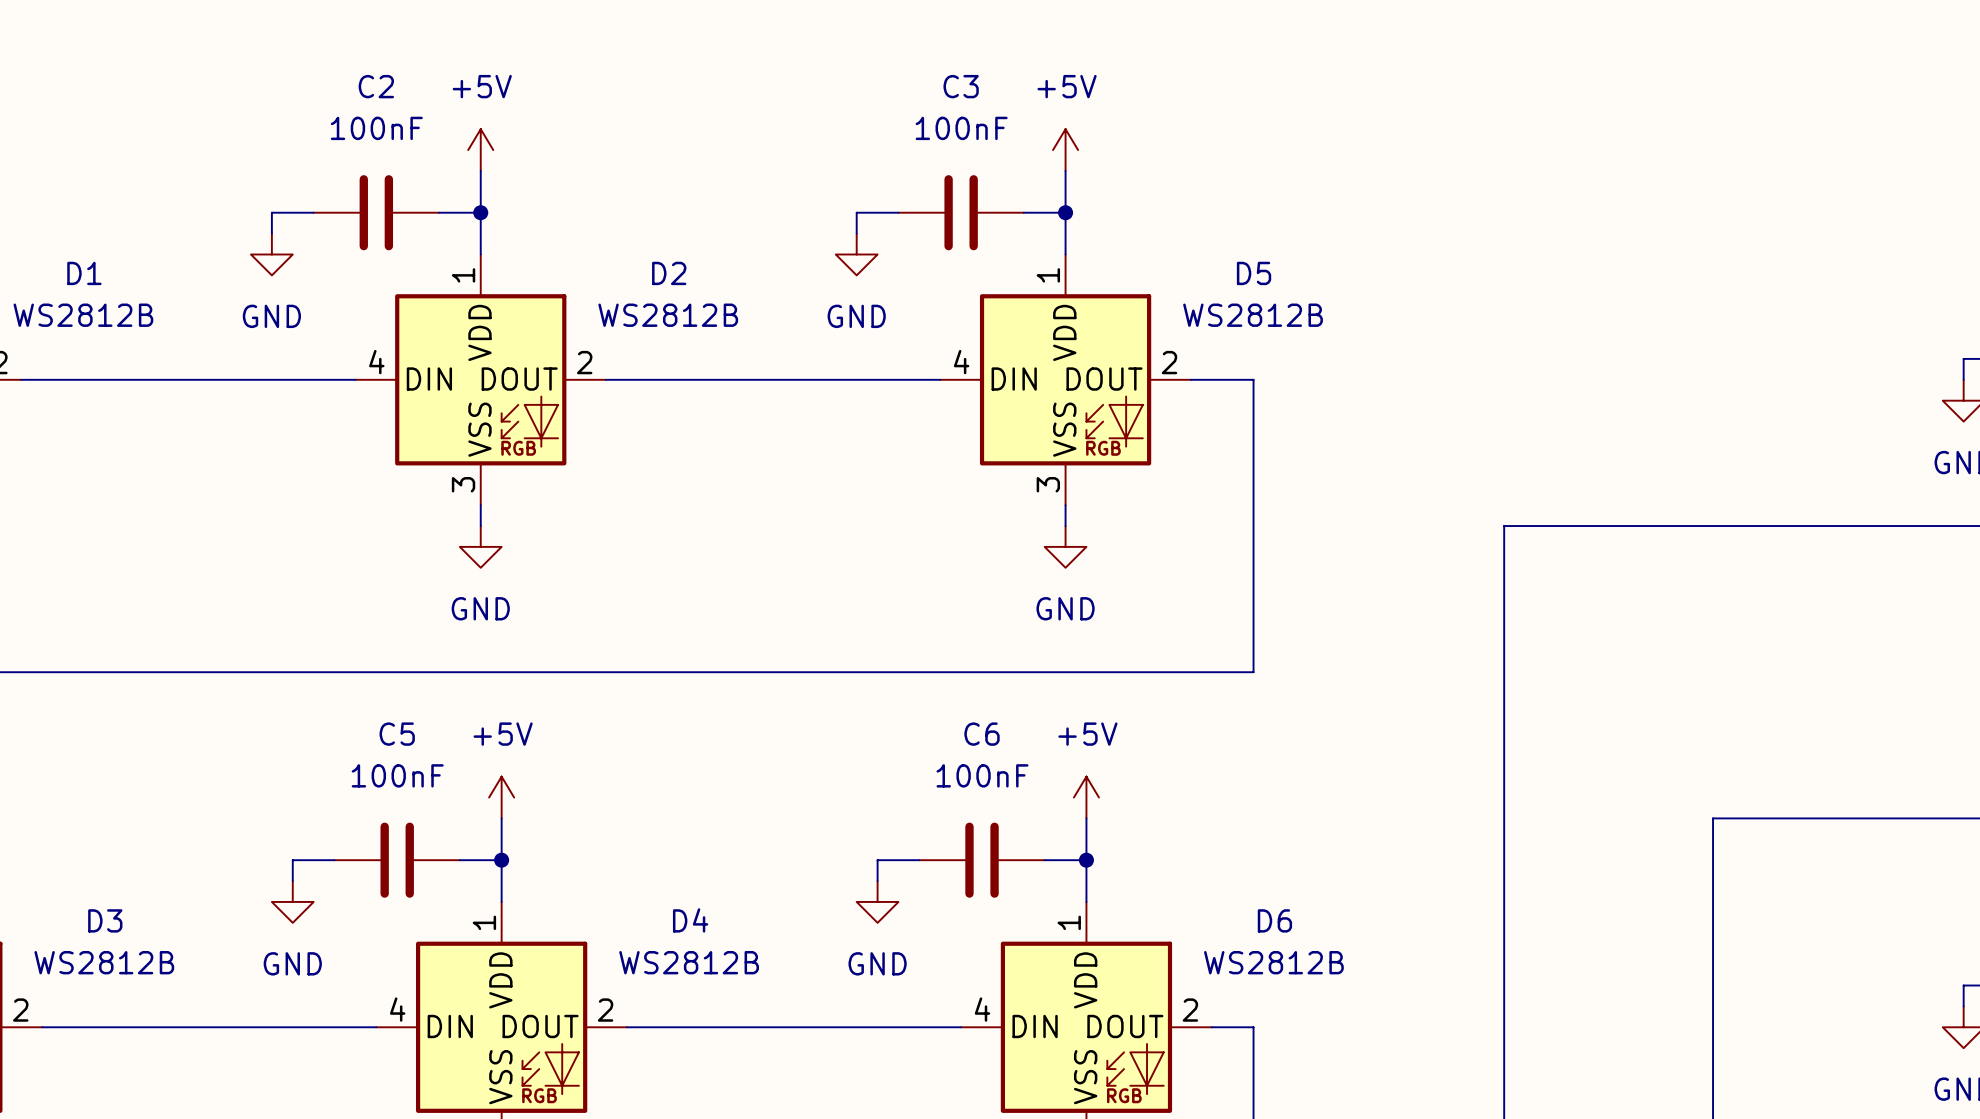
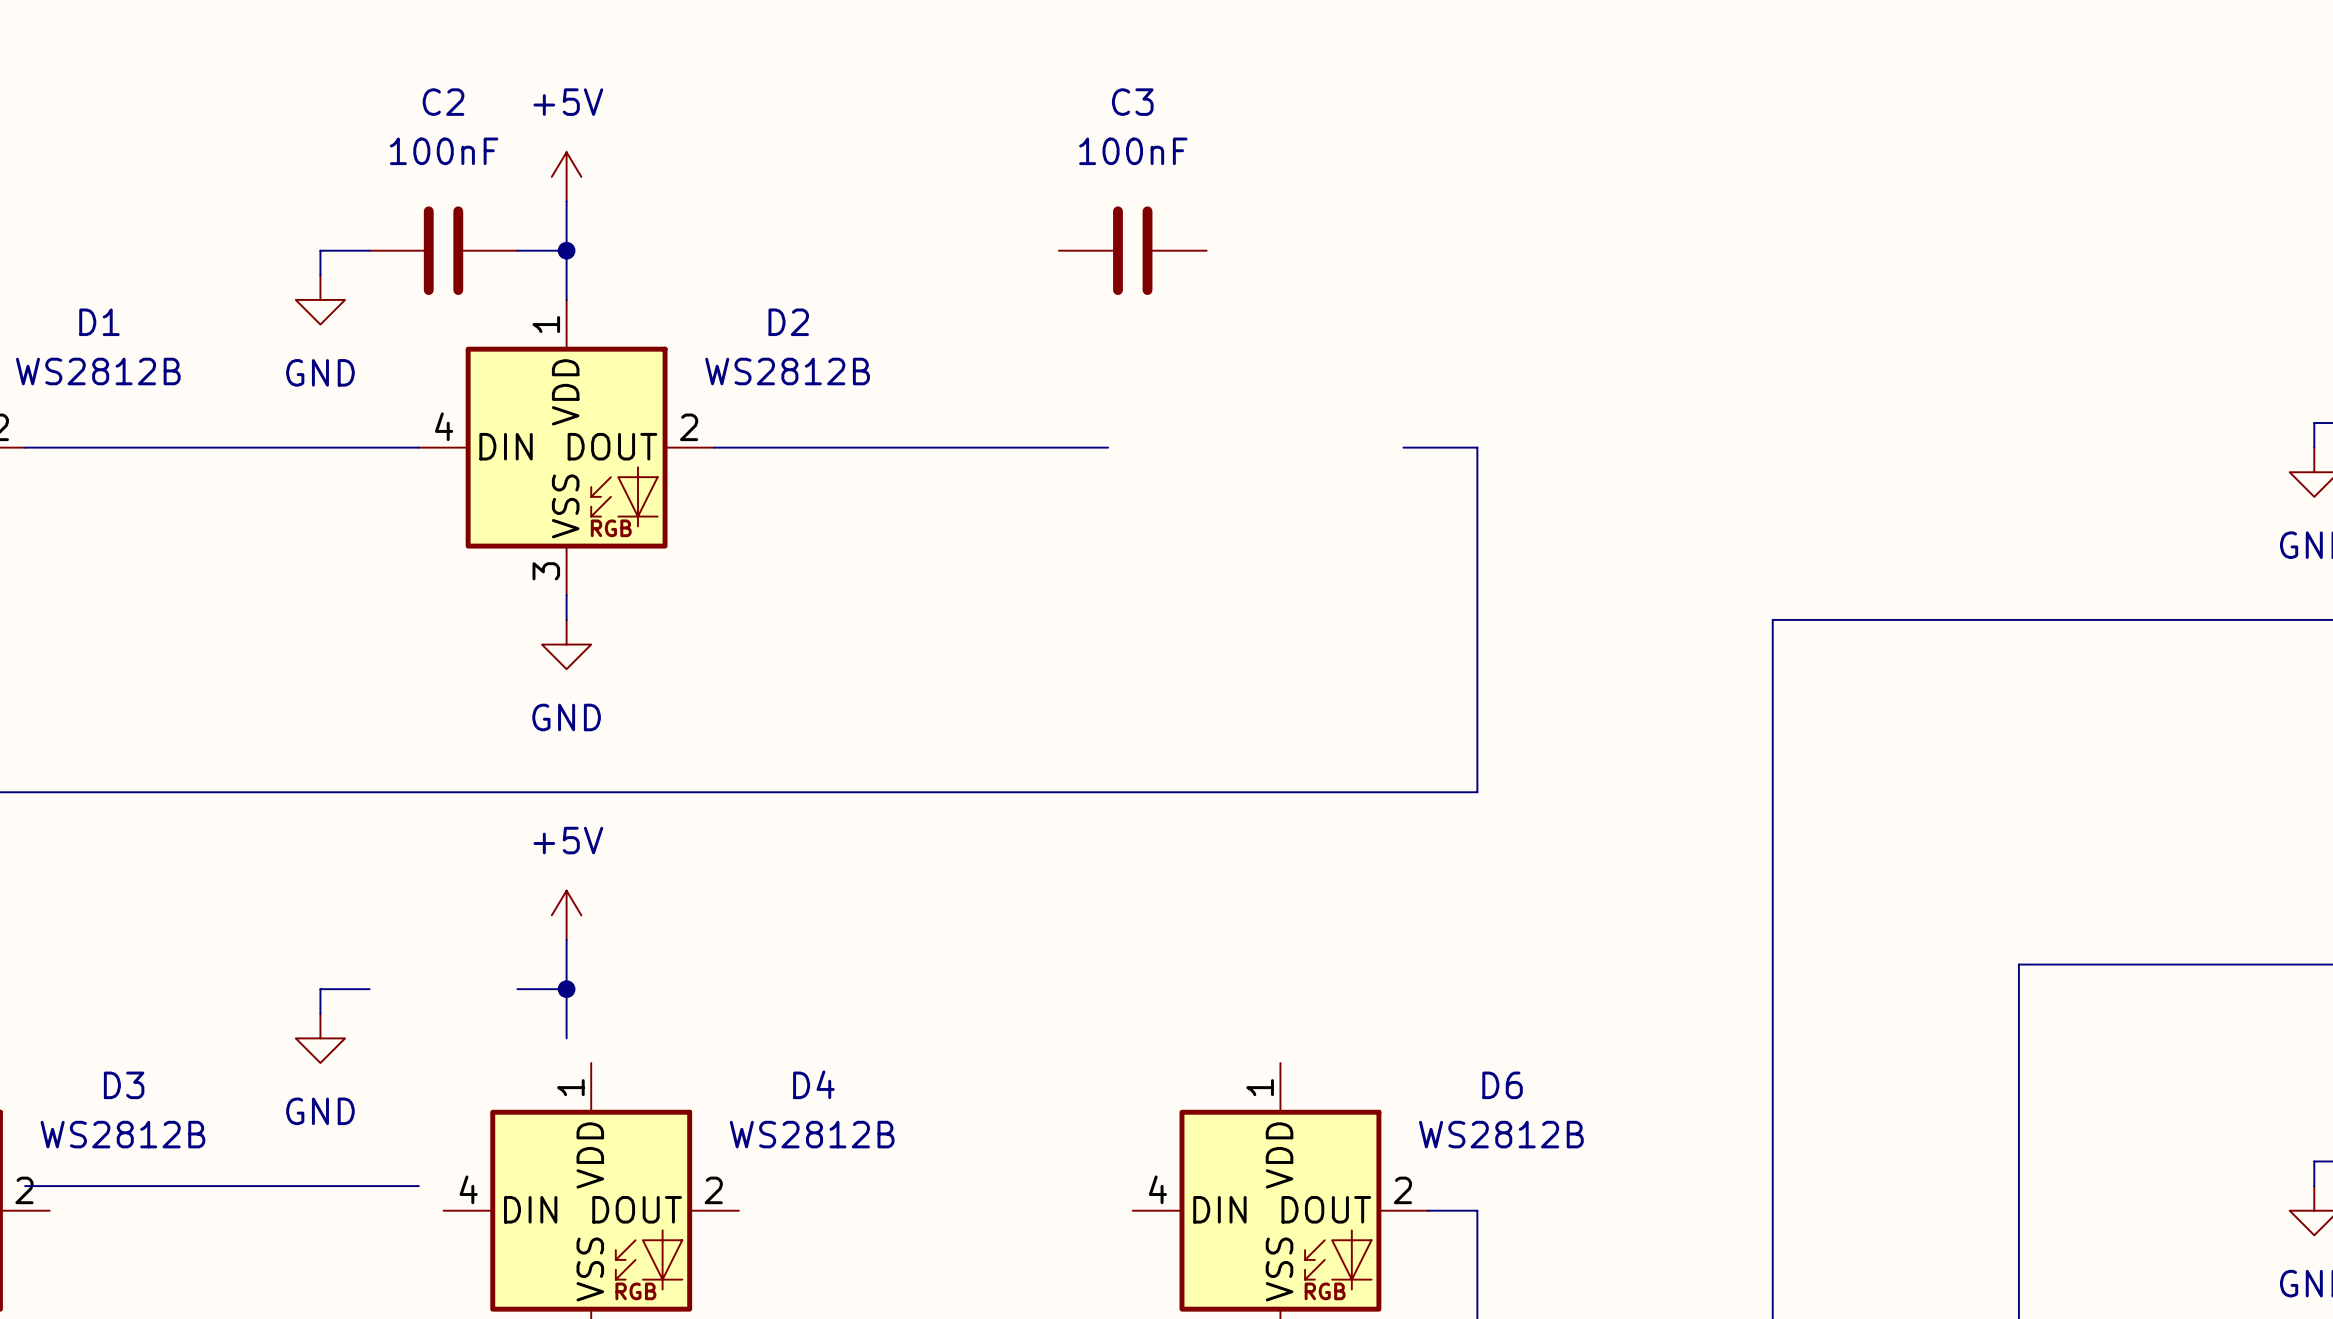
power symbol: +5V (1065, 150) -> none
wire: (1065, 170) (1065, 254) -> none
wire: (898, 212) (856, 212) (856, 233) -> none
wire: (1023, 212) (1065, 212) -> none
junction: (1065, 212) -> none
power symbol: GND (856, 254) -> none
D5: WS2812B (1065, 379) -> none
wire: (1065, 505) (1065, 526) -> none
power symbol: GND (1065, 546) -> none
power symbol position: +5V (501, 797) -> +5V (566, 915)
power symbol: +5V (1086, 797) -> none
wire: (501, 818) (501, 901) -> (566, 939) (566, 1038)
wire: (1086, 818) (1086, 901) -> none
wire: (334, 860) (292, 860) (292, 881) -> (369, 989) (320, 989) (320, 1013)
C5: 100nF (397, 860) -> none
wire: (459, 860) (501, 860) -> (517, 989) (566, 989)
junction position: (501, 860) -> (566, 989)
wire: (919, 860) (877, 860) (877, 881) -> none
C6: 100nF (982, 860) -> none
wire: (1044, 860) (1086, 860) -> none
junction: (1086, 860) -> none
power symbol position: GND (292, 901) -> GND (320, 1038)
power symbol: GND (877, 901) -> none
wire: (42, 1027) (376, 1027) -> (25, 1186) (418, 1186)
wire: (626, 1027) (961, 1027) -> none

